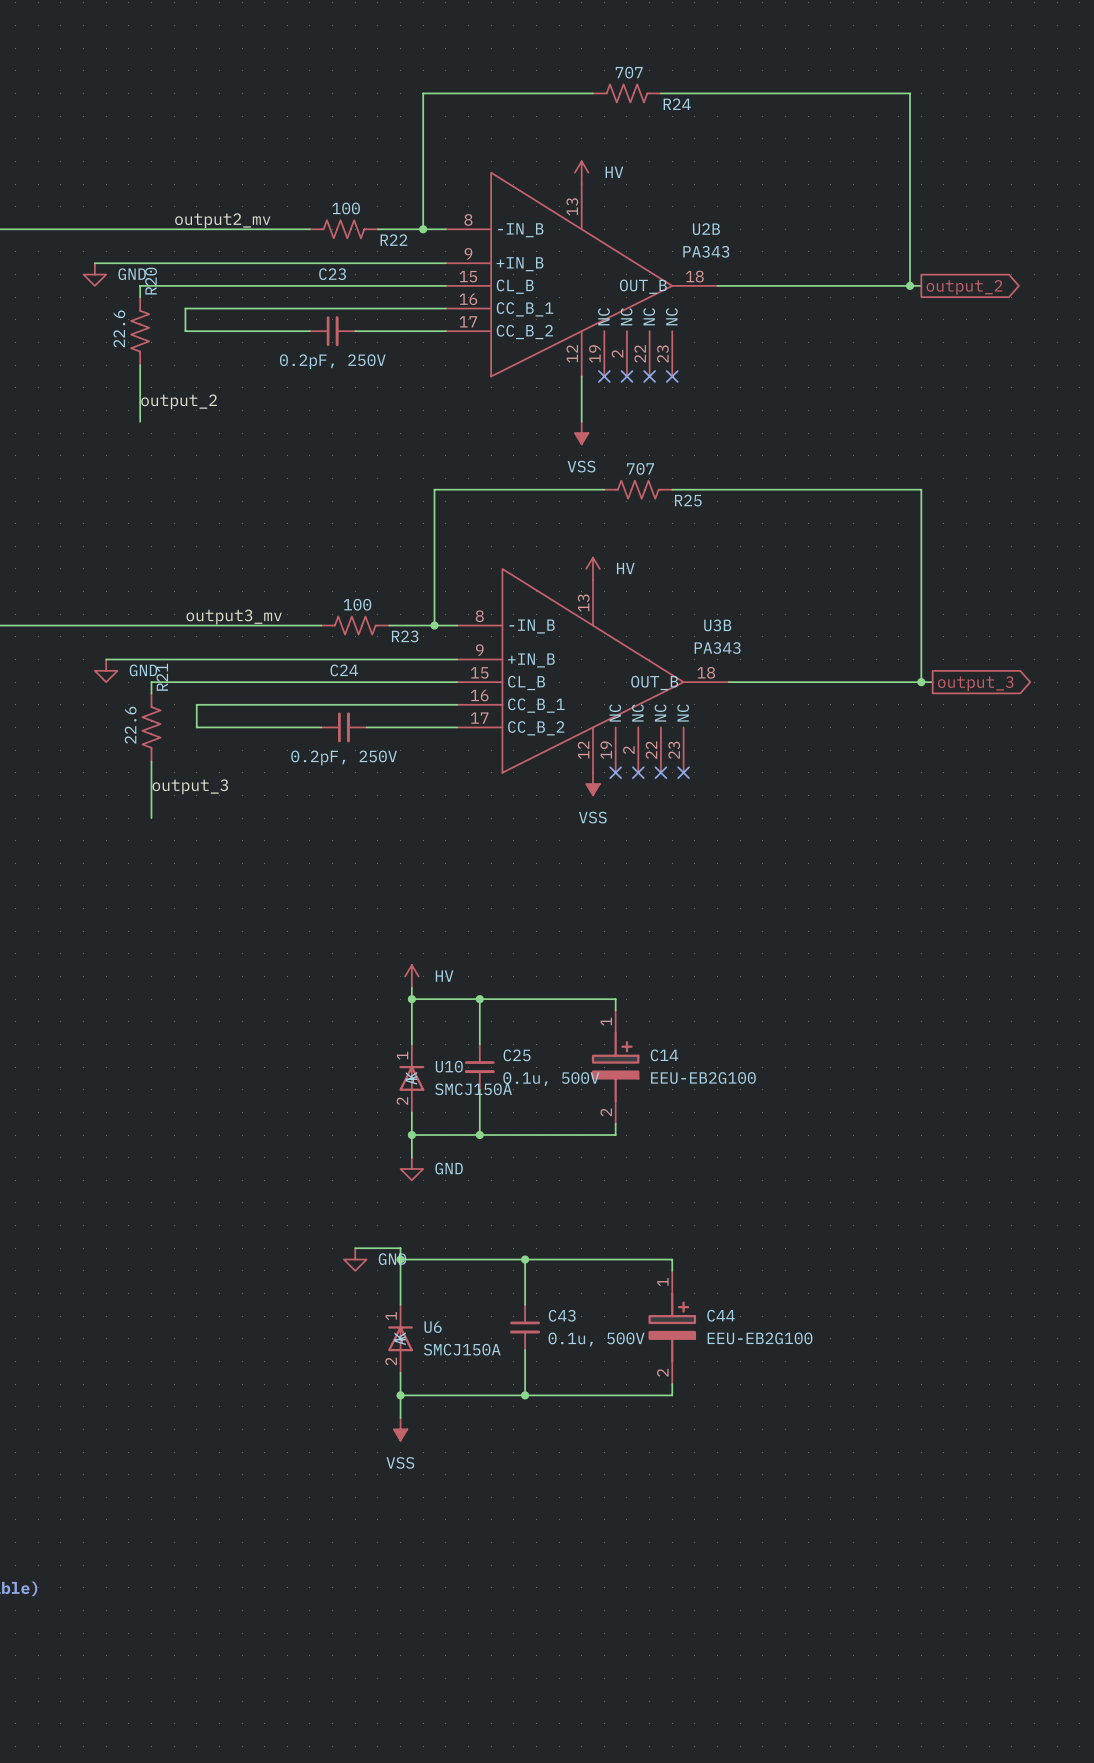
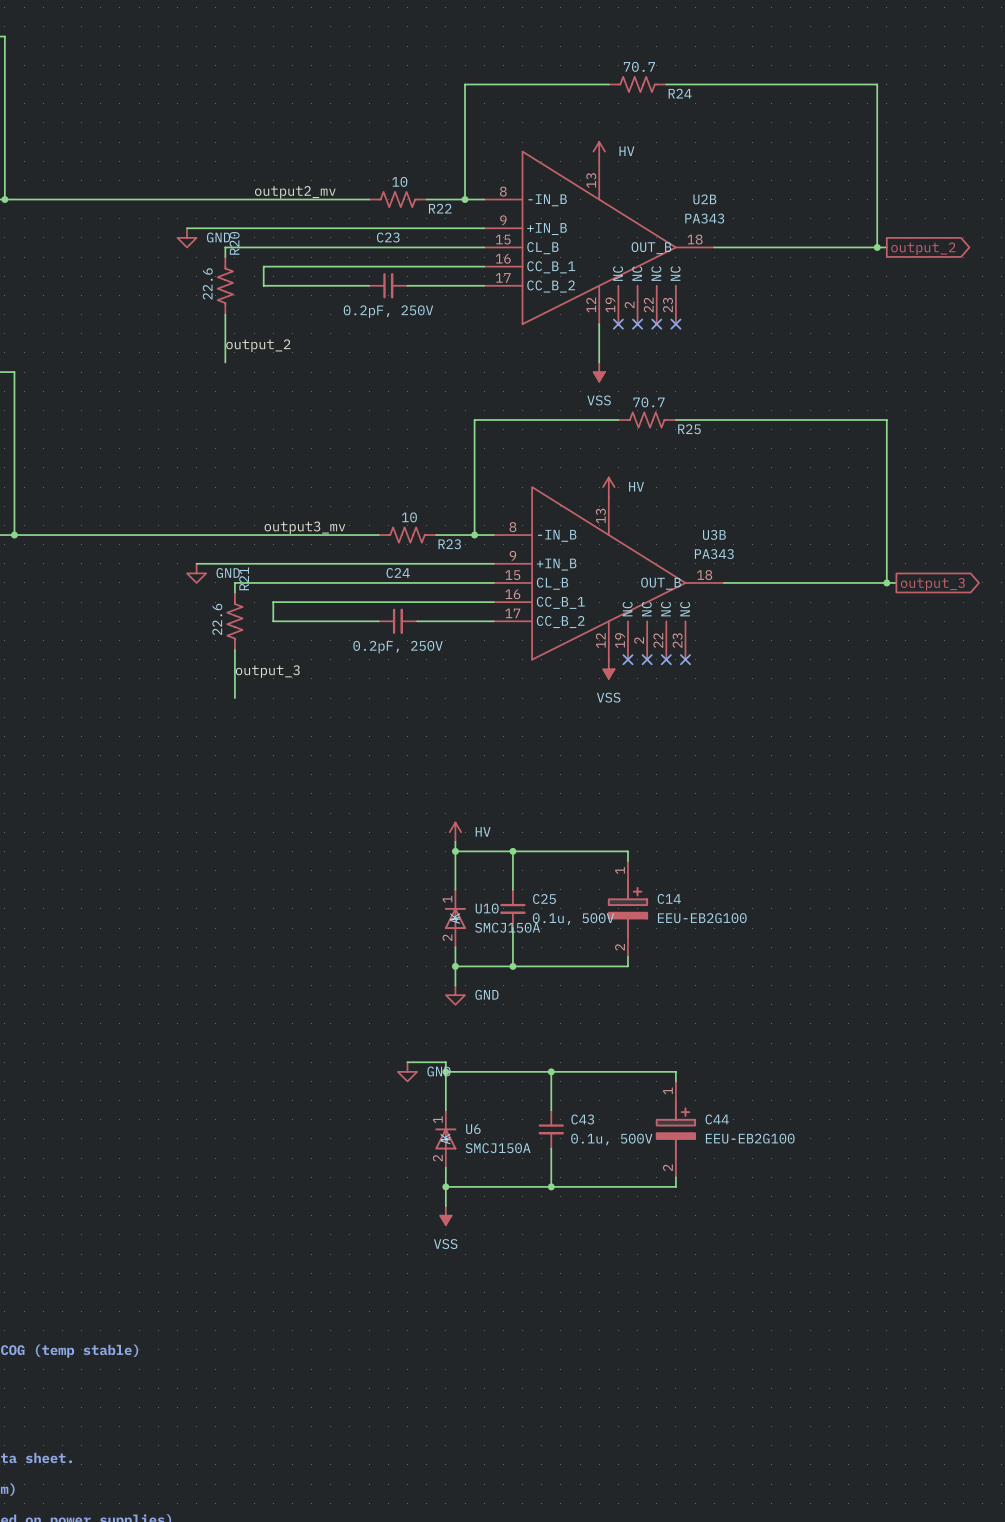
R24 value: 707 (629, 72) -> 70.7 (639, 66)
R22 value: 100 (346, 208) -> 10 (399, 181)
R25 value: 707 (640, 468) -> 70.7 (649, 402)
R23 value: 100 (357, 604) -> 10 (409, 517)

